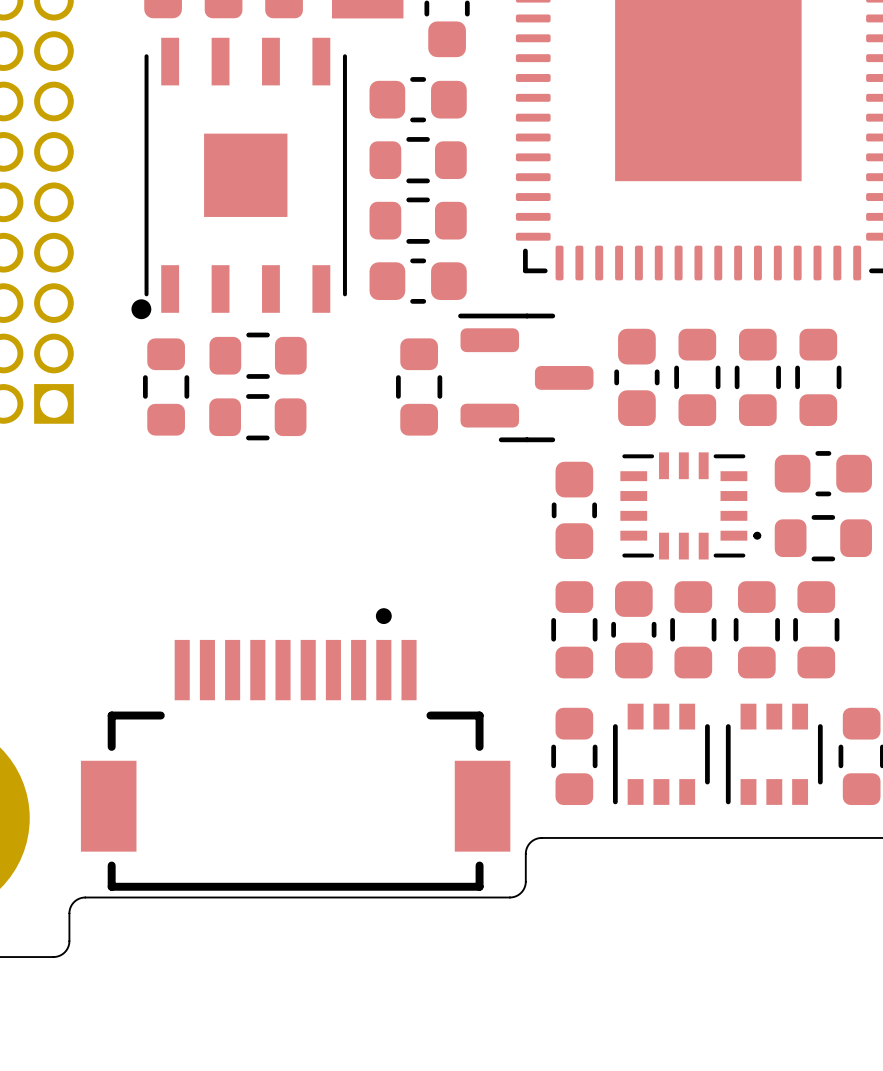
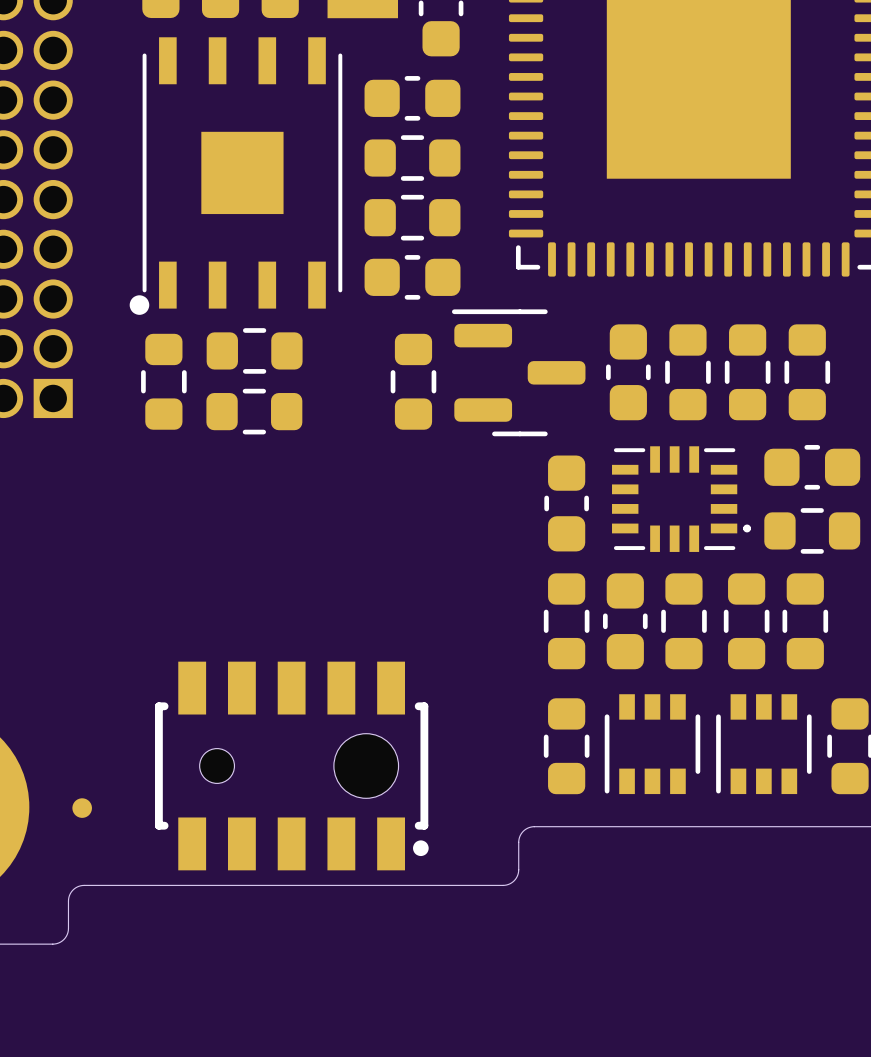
part footprint: [80, 608, 511, 891] -> [155, 661, 429, 871]
part: none -> (82, 808)

